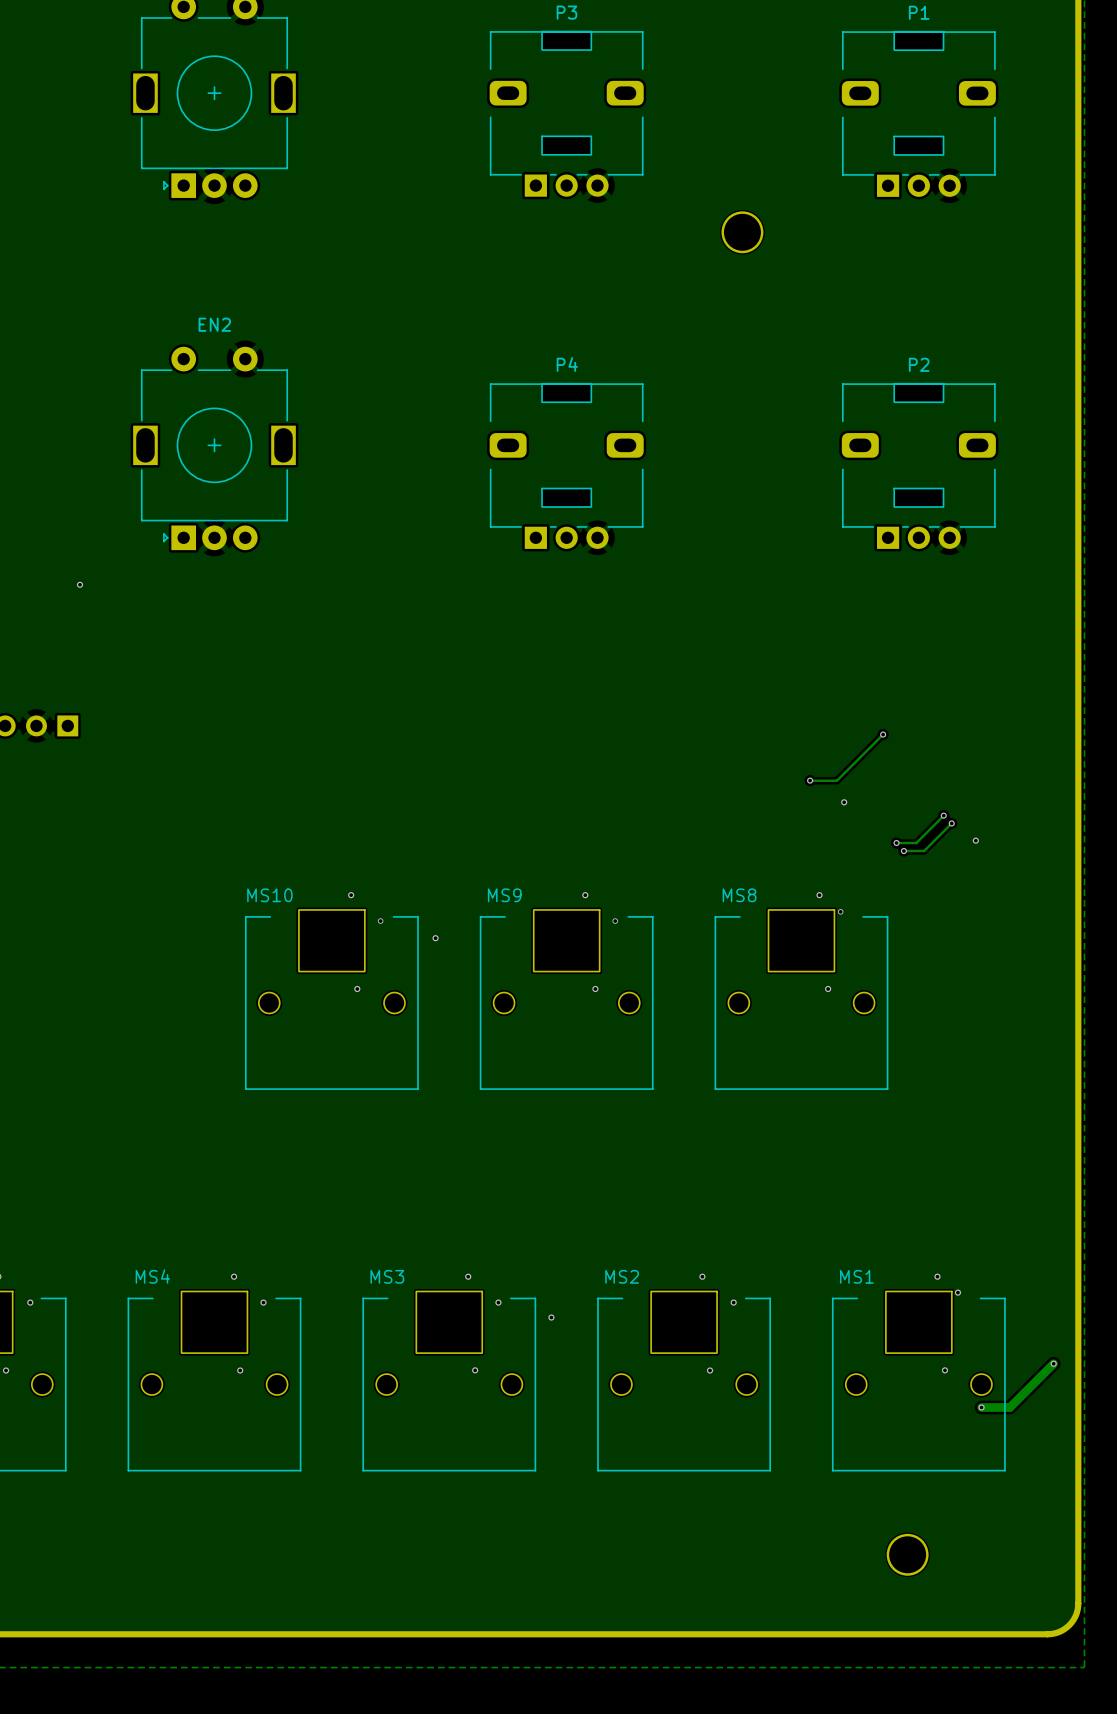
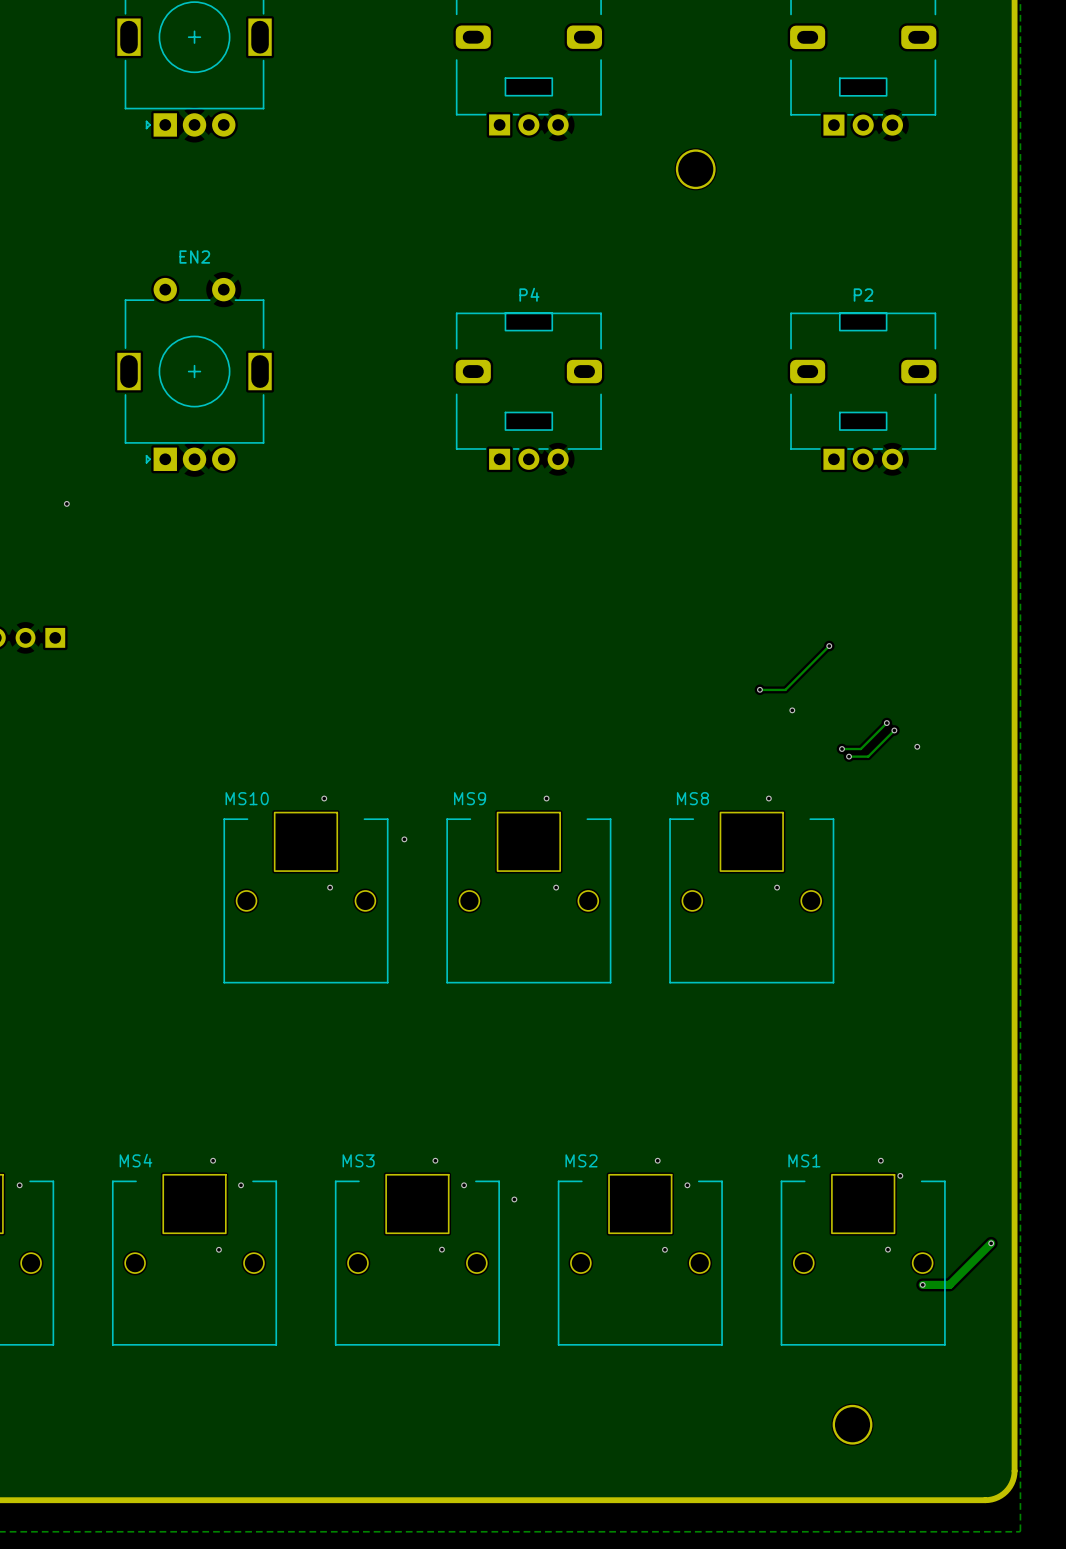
via: (840, 911) -> none
via: (380, 921) -> none
via: (615, 921) -> none

